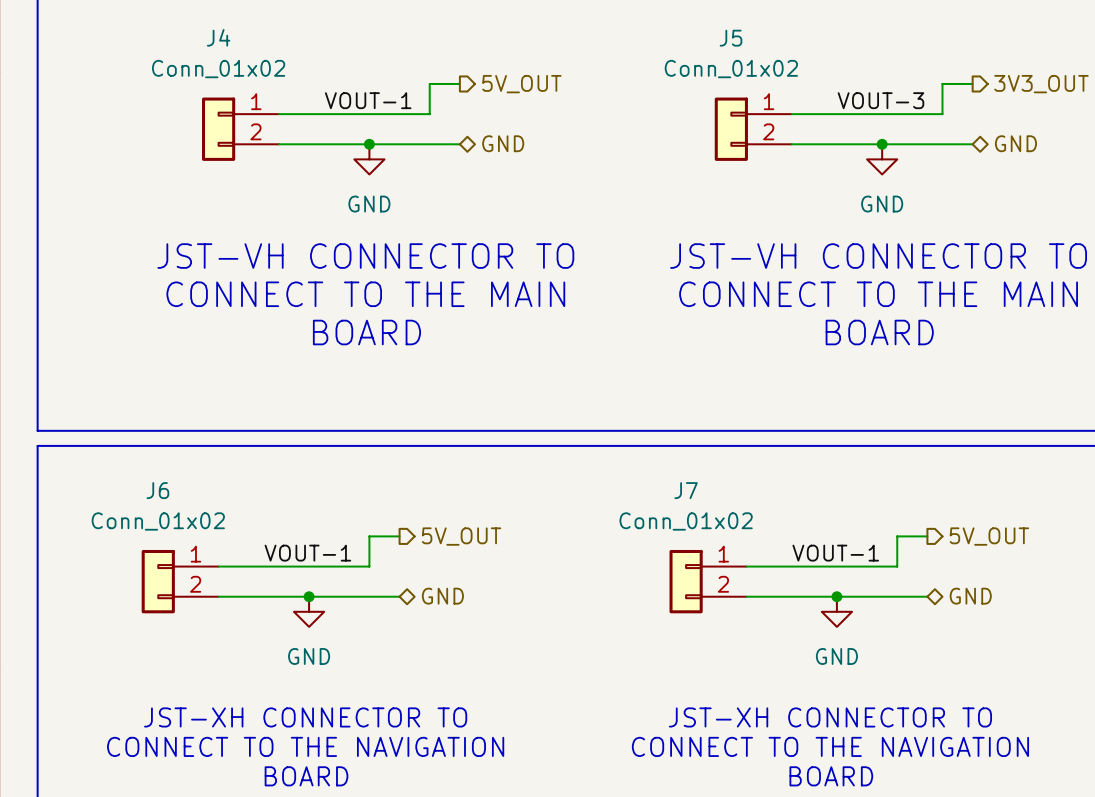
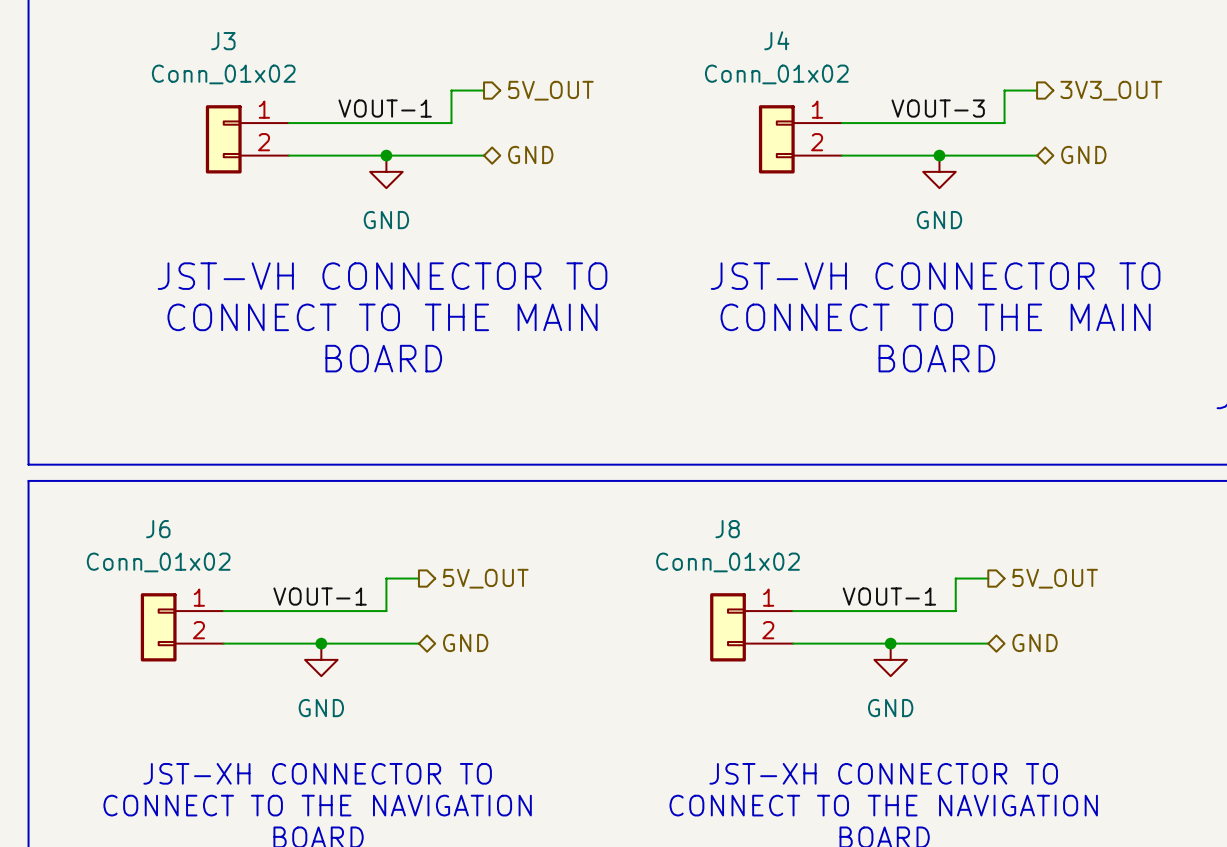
J4 name: J4 (218, 37) -> J3 (223, 41)
J5 name: J5 (730, 38) -> J4 (776, 40)
J7 name: J7 (686, 490) -> J8 (727, 529)

